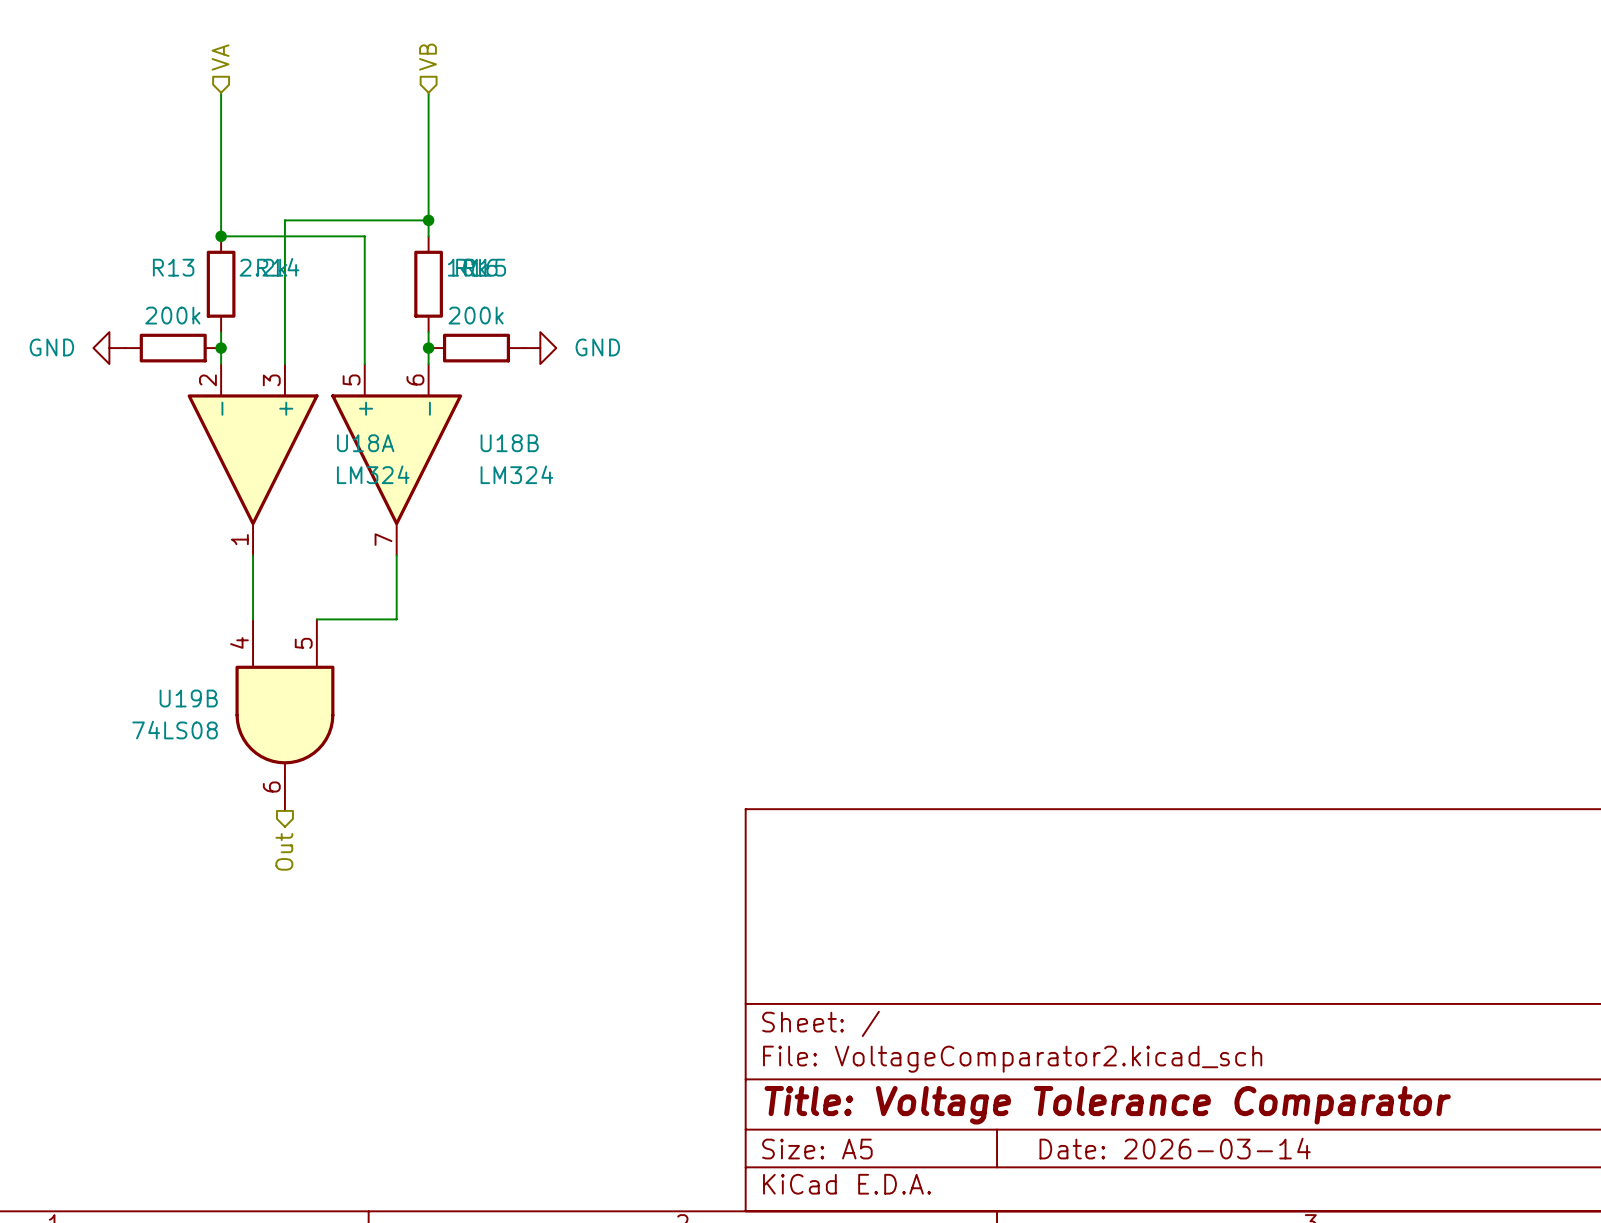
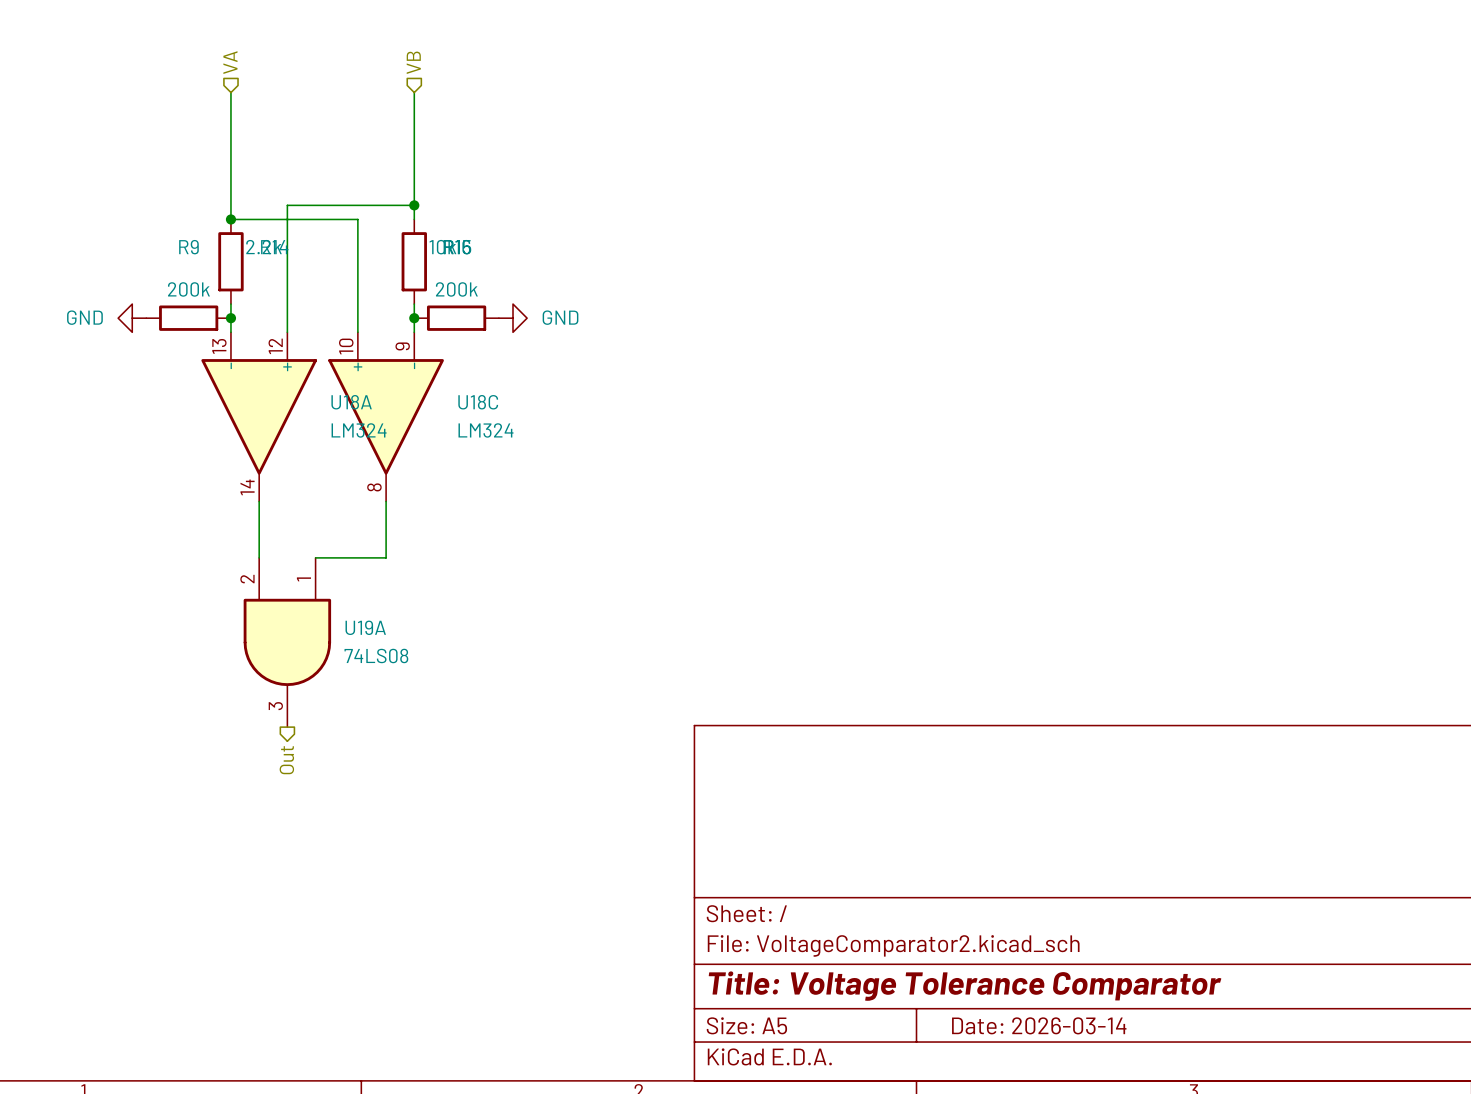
R13 name: R13 (173, 267) -> R9 (188, 247)
U18A pin number: 2 (207, 380) -> 13 (219, 346)
U18A pin number: 3 (271, 380) -> 12 (275, 346)
U18B pin number: 5 (351, 380) -> 10 (346, 346)
U18B pin number: 6 (415, 380) -> 9 (402, 346)
U18B name: U18B (509, 443) -> U18C (478, 402)
U18A pin number: 1 (239, 539) -> 14 (247, 487)
U18B pin number: 7 (383, 539) -> 8 (374, 487)
U19B pin number: 4 (239, 642) -> 2 (247, 579)
U19B pin number: 5 (303, 643) -> 1 (303, 579)
U19B name: U19B (188, 698) -> U19A (365, 627)
U19B value position: 74LS08 (175, 730) -> 74LS08 (376, 655)
U19B pin number: 6 (271, 786) -> 3 (275, 706)

